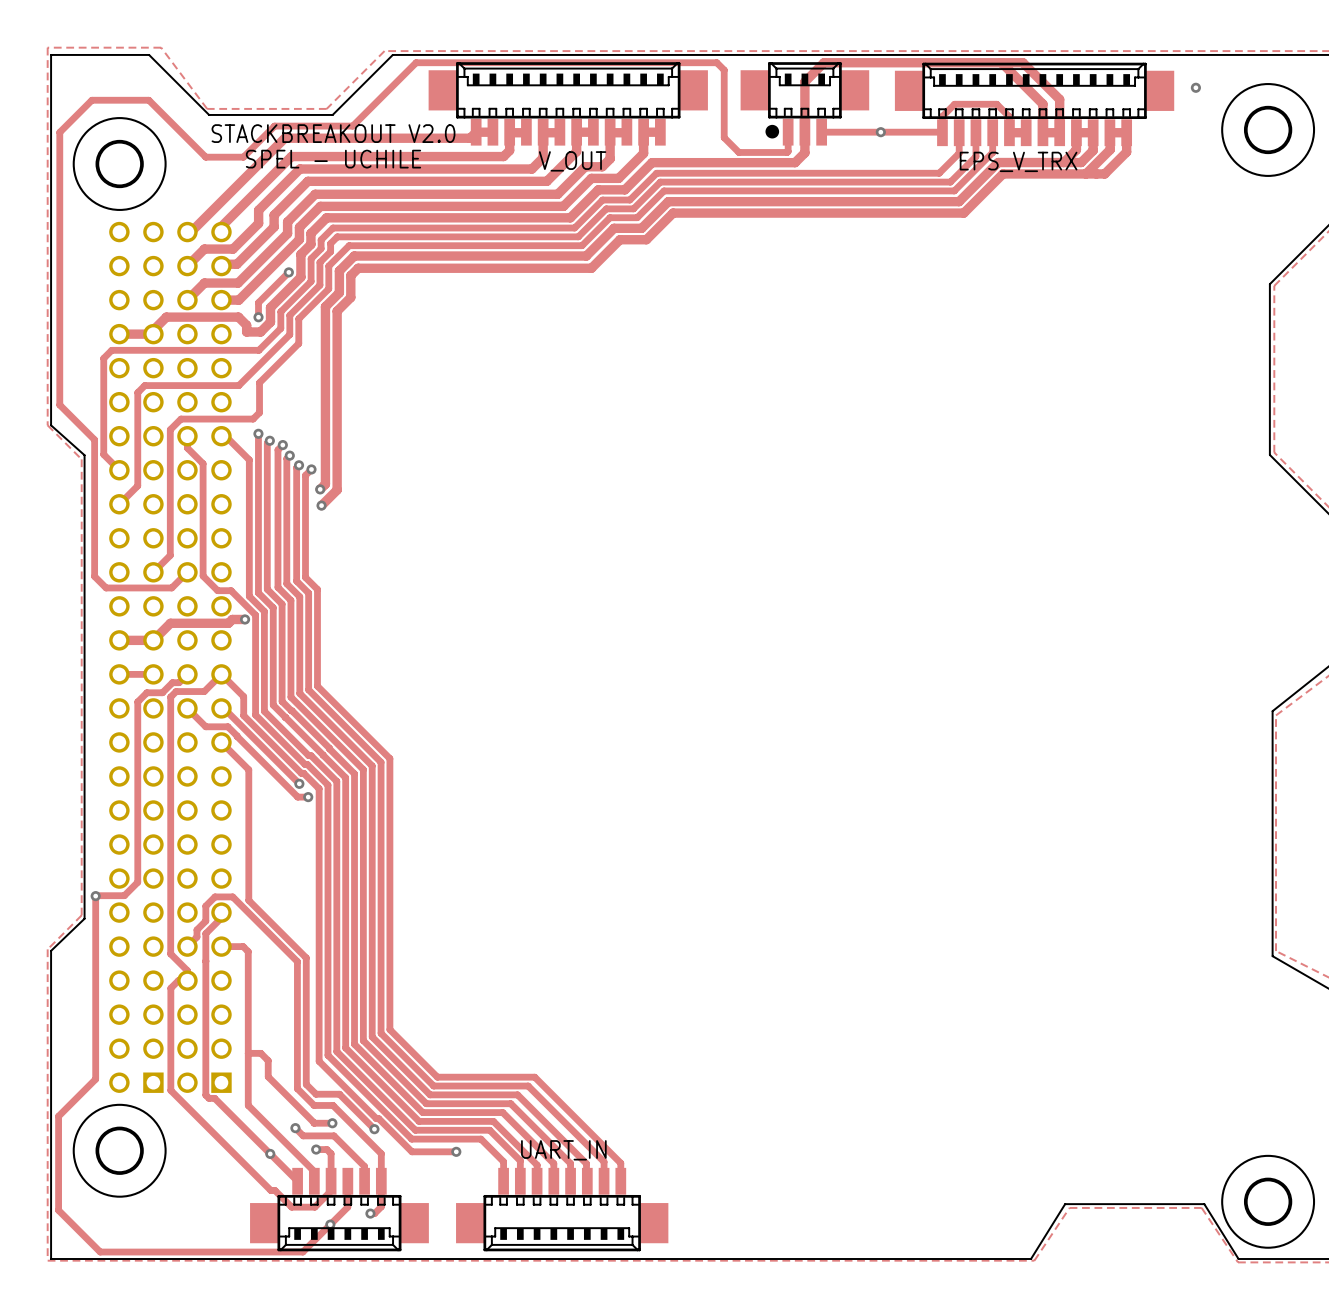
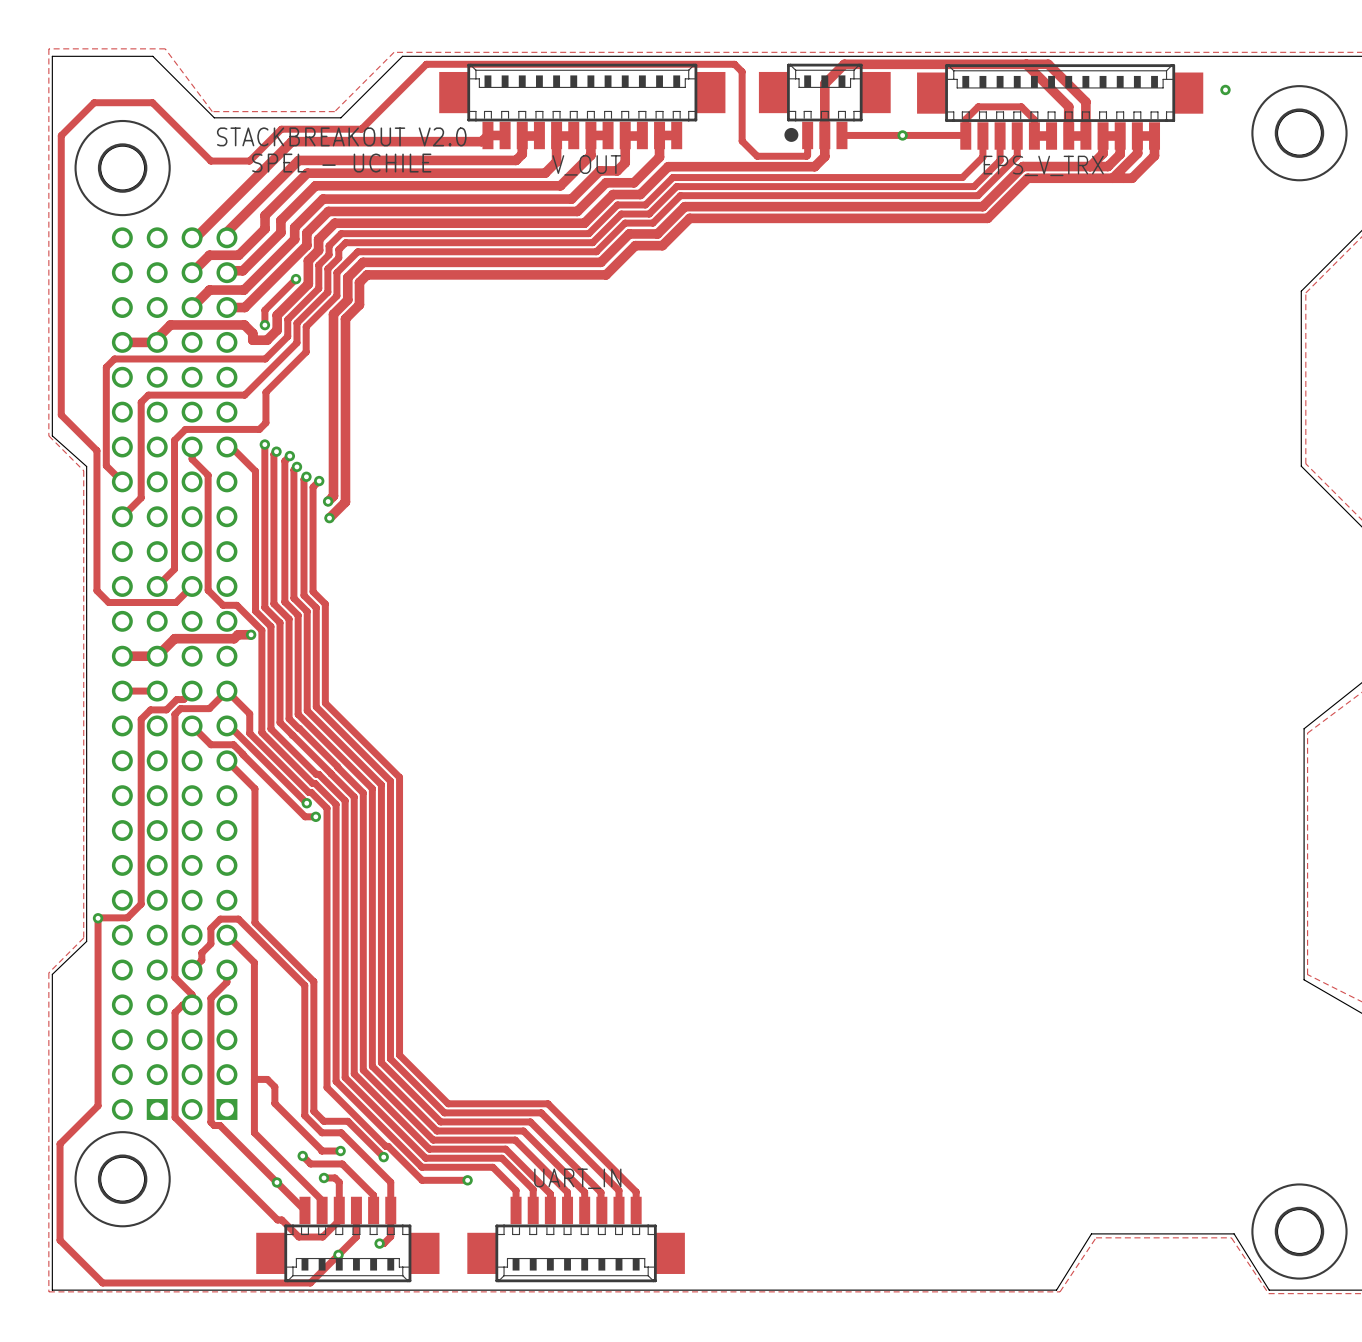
track: (221, 912) (221, 917) (205, 933) (205, 974) -> (226, 970) (226, 982) (210, 998)
track: (221, 946) (243, 946) (248, 951) -> (226, 935) (254, 962) (254, 975)

